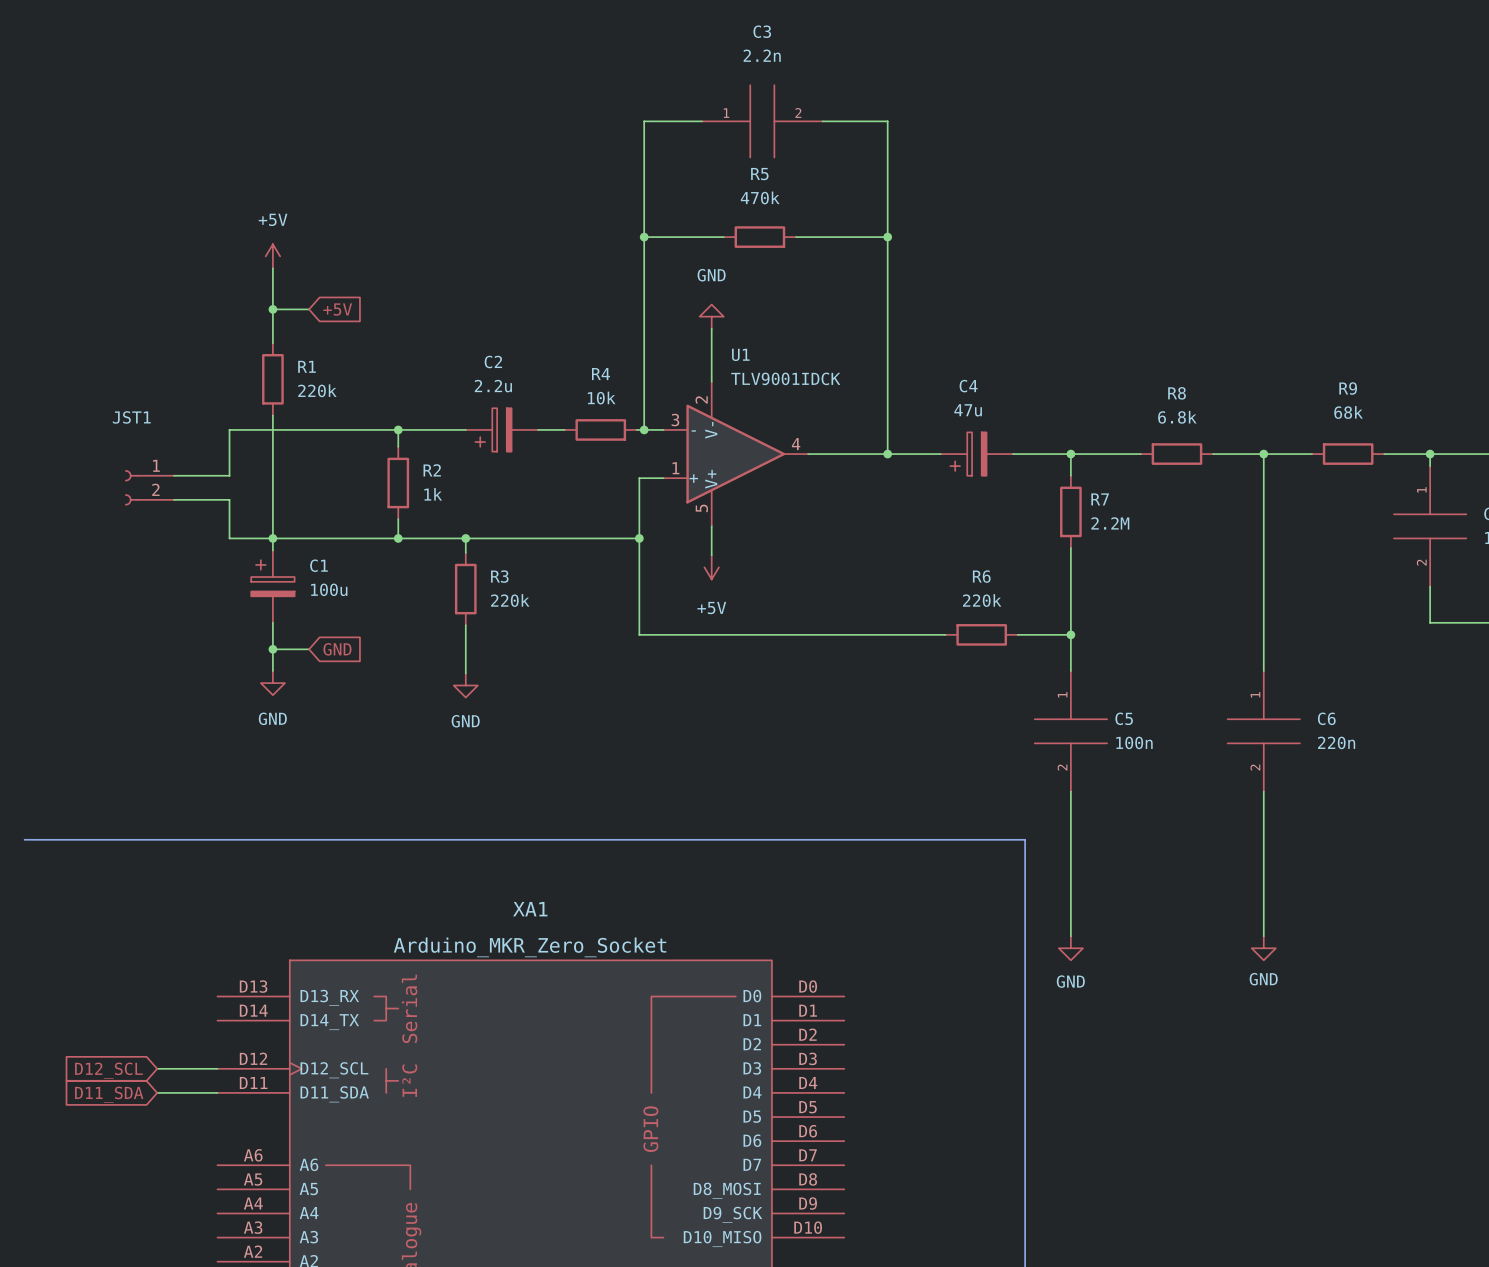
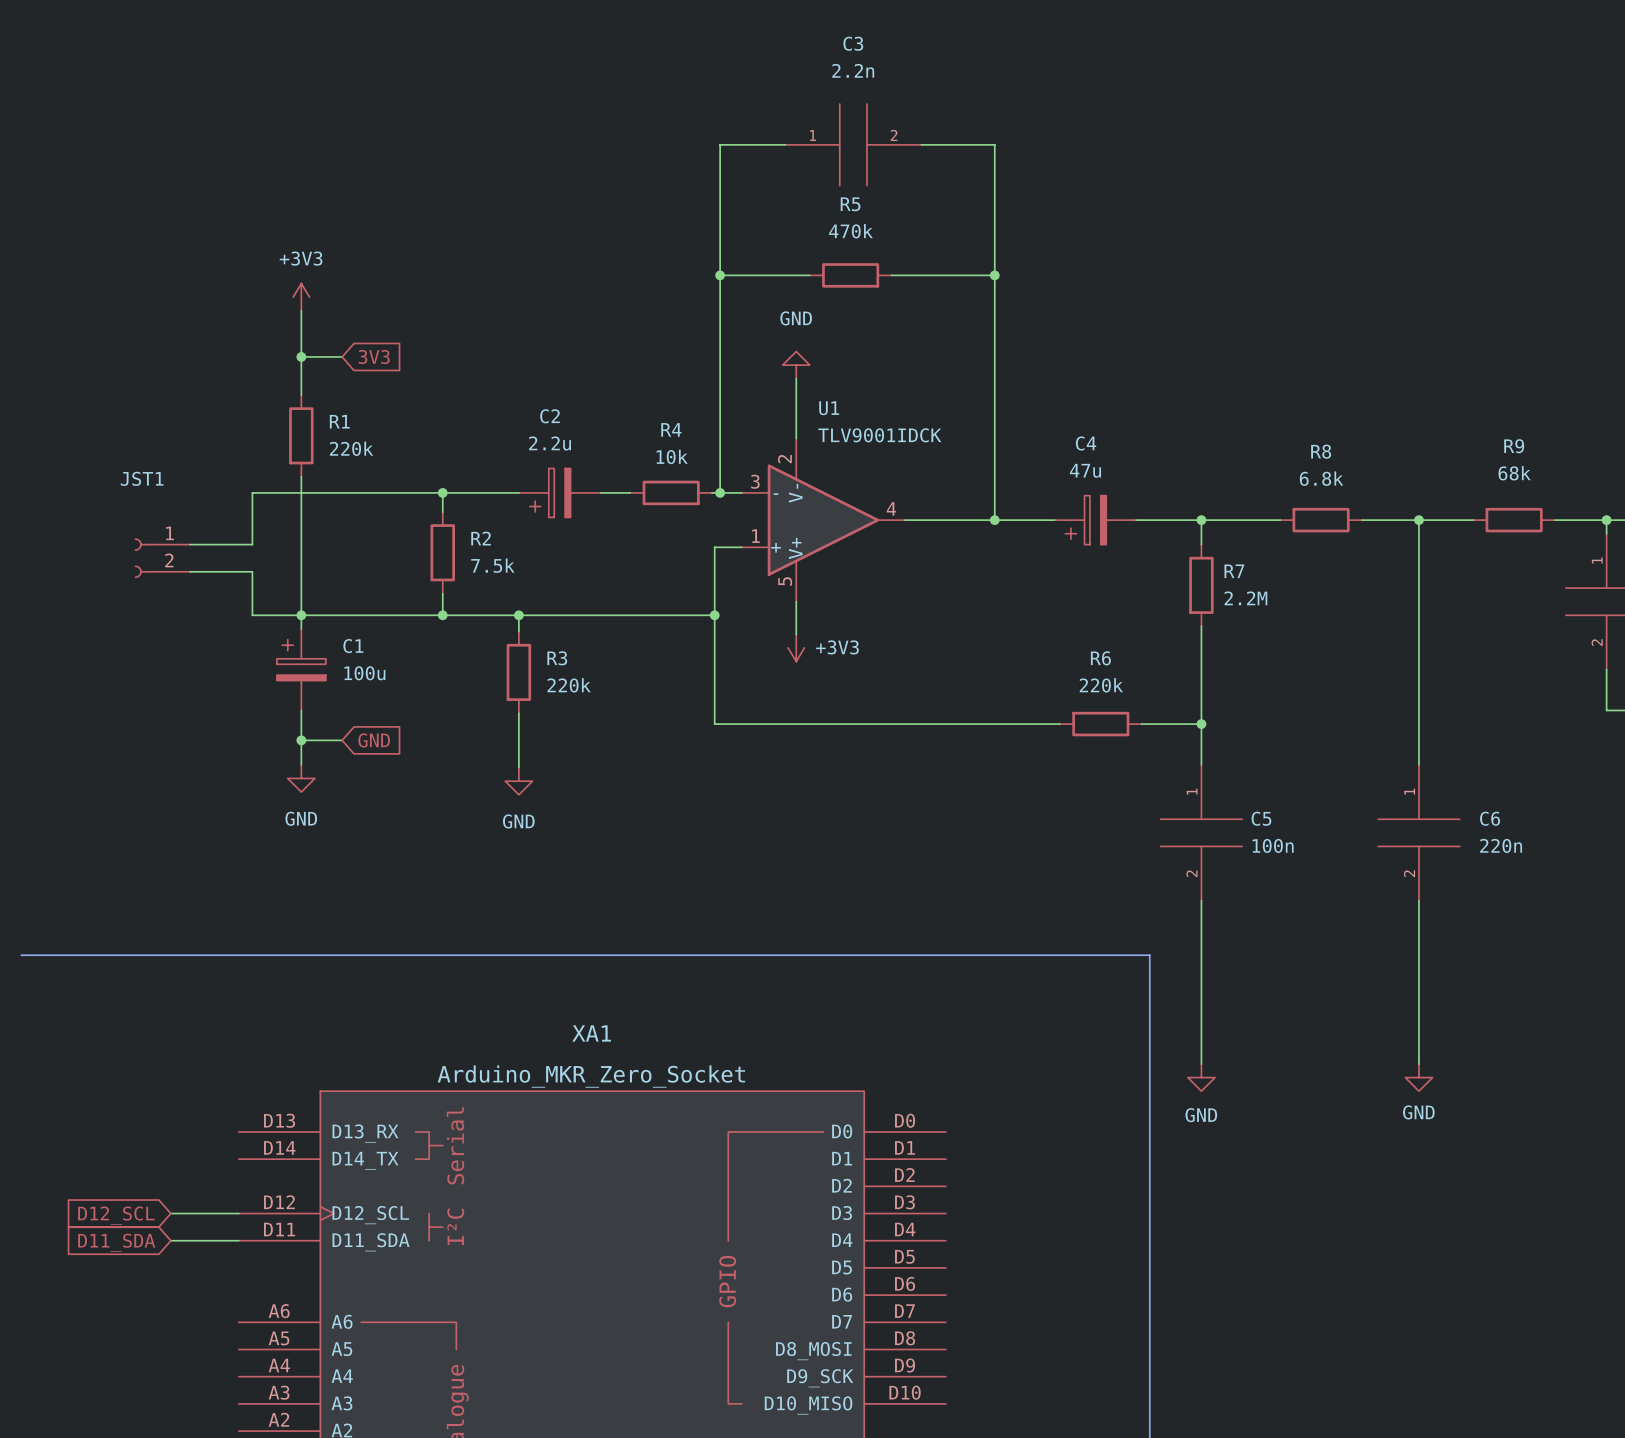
power symbol: +5V (272, 256) -> +3V3 (301, 297)
global label: +5V (337, 309) -> 3V3 (374, 356)
R2 value: 1k (433, 494) -> 7.5k (492, 565)
power symbol: +5V (711, 567) -> +3V3 (796, 647)

